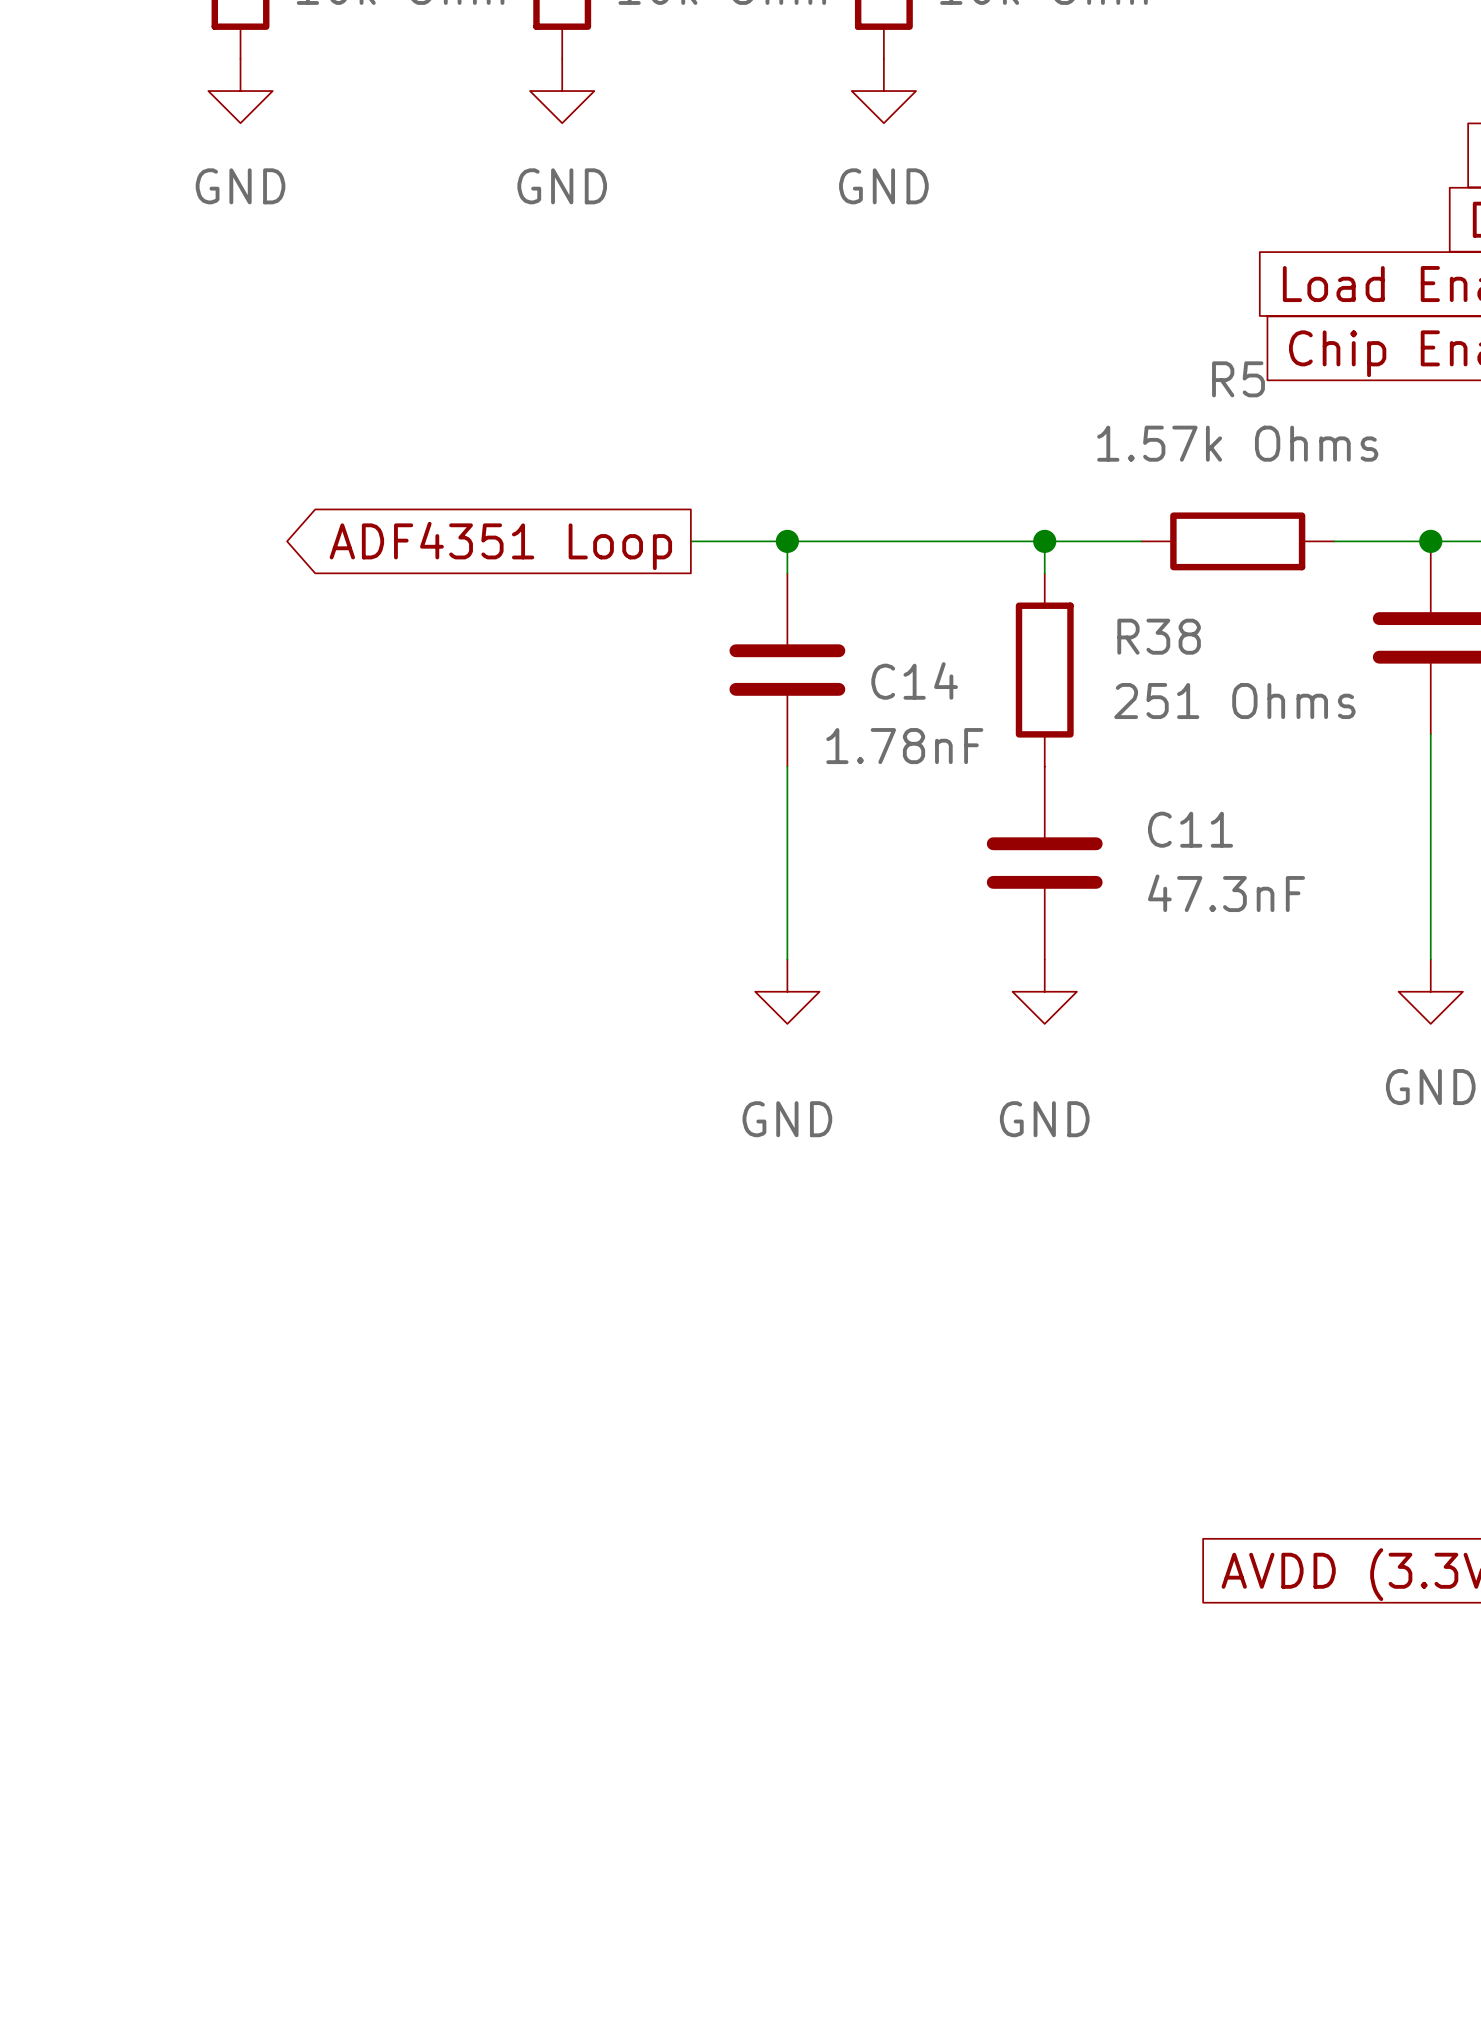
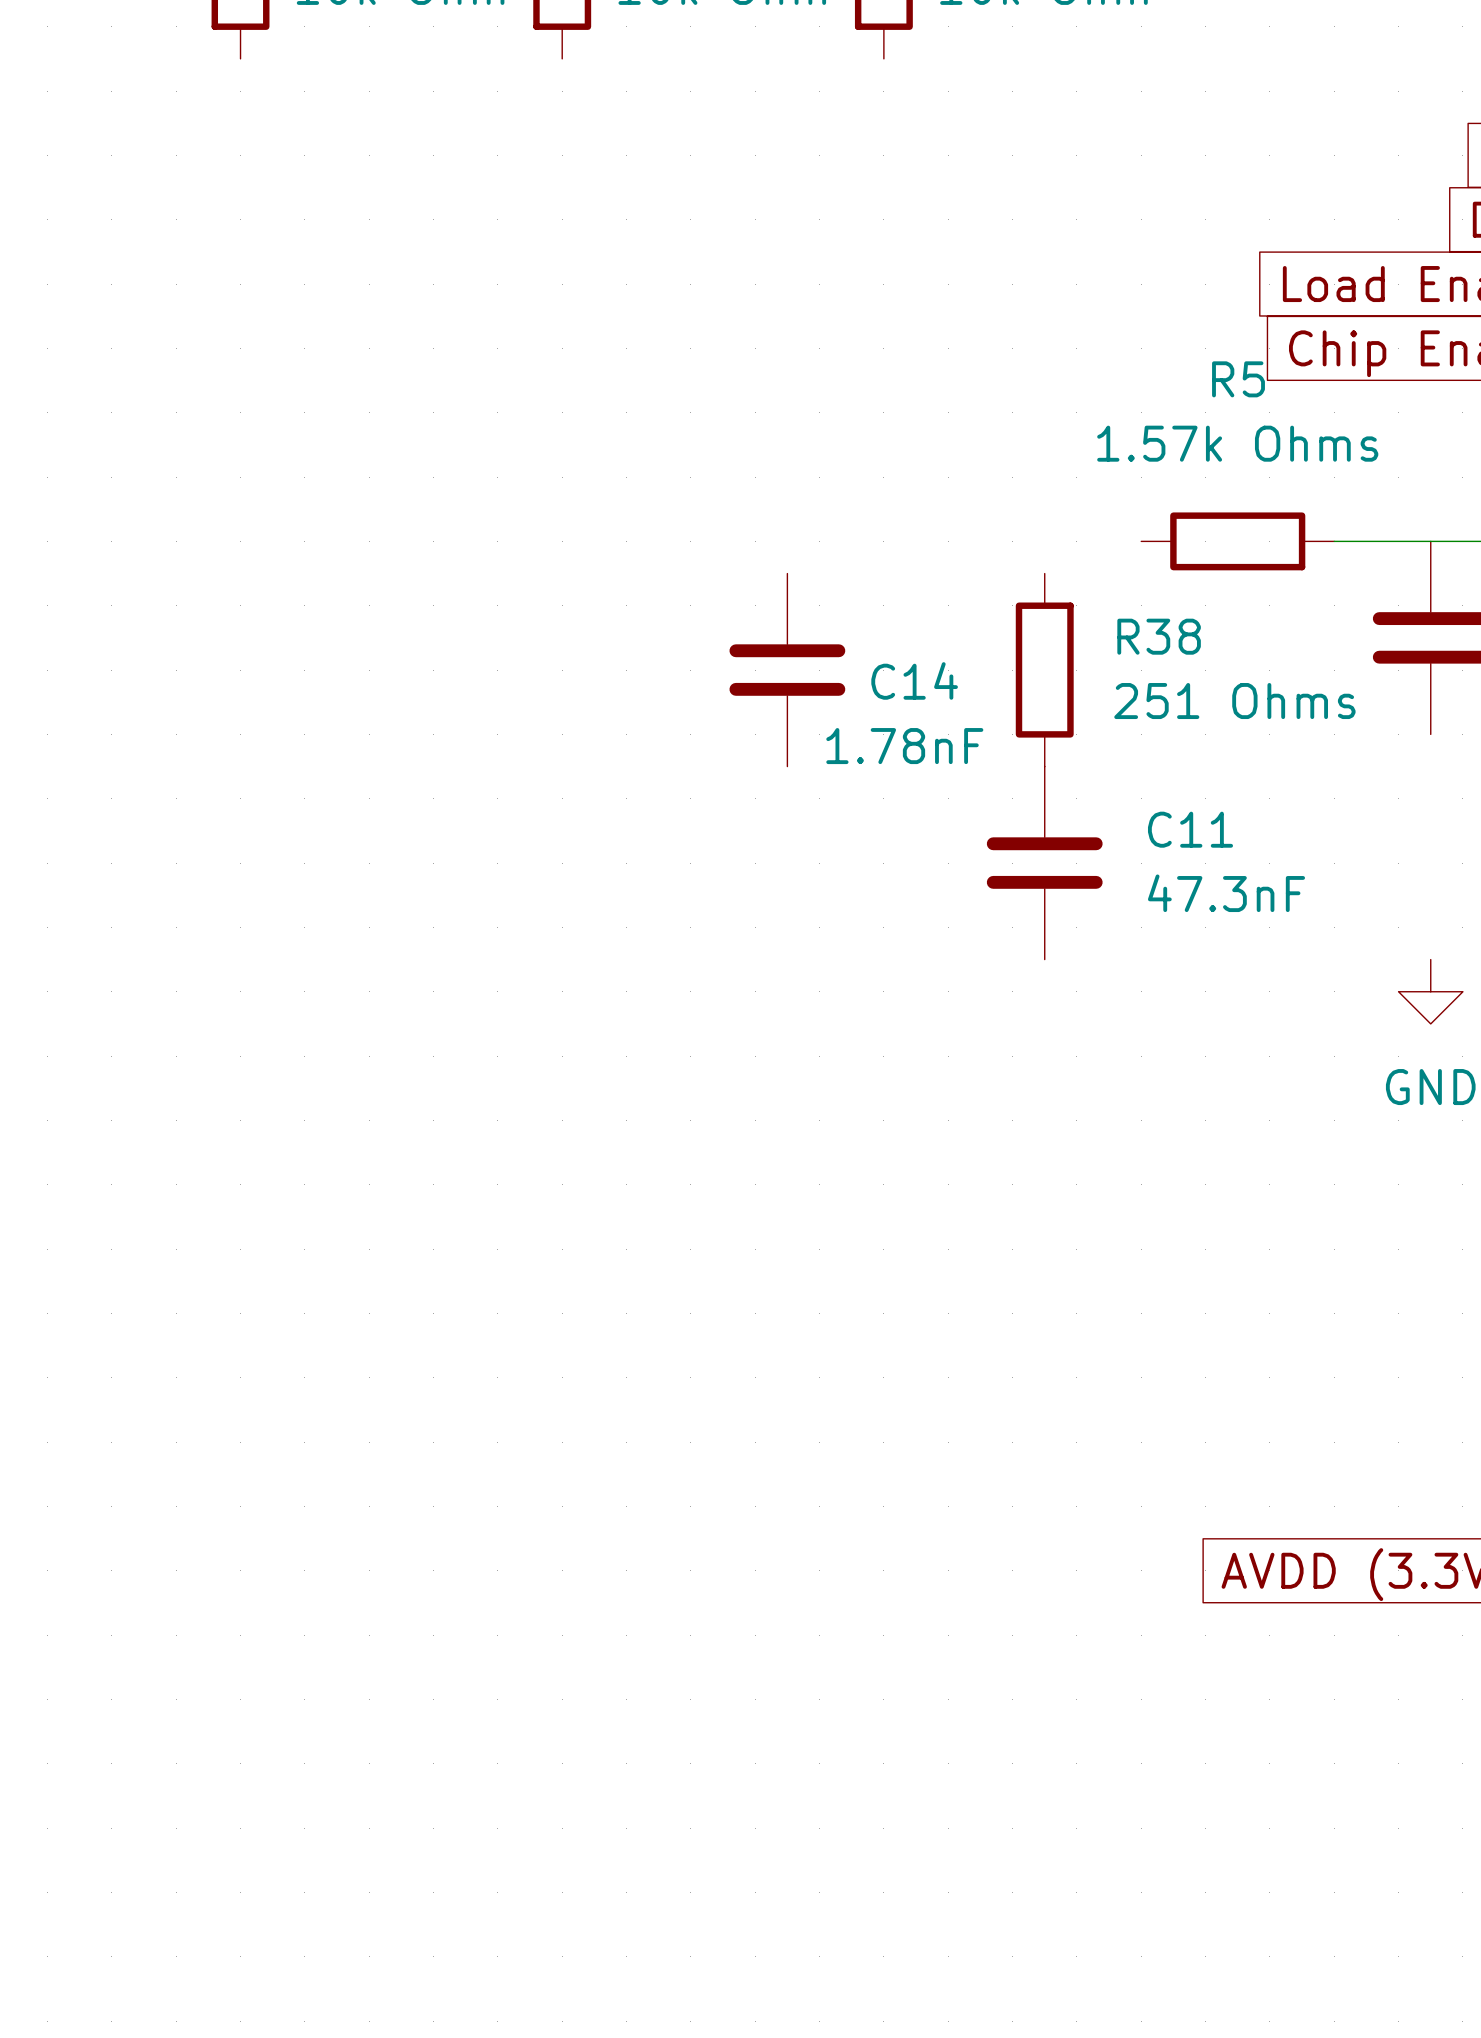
power symbol: GND (240, 91) -> none
power symbol: GND (562, 91) -> none
power symbol: GND (883, 91) -> none
wire: (690, 541) (1141, 541) -> none
wire: (787, 541) (787, 573) -> none
junction: (787, 541) -> none
wire: (1044, 541) (1044, 573) -> none
junction: (1044, 541) -> none
junction: (1430, 541) -> none
global label: ADF4351 Loop (500, 545) -> none
wire: (1430, 734) (1430, 959) -> none
wire: (787, 766) (787, 959) -> none
power symbol: GND (787, 991) -> none
power symbol: GND (1044, 991) -> none

